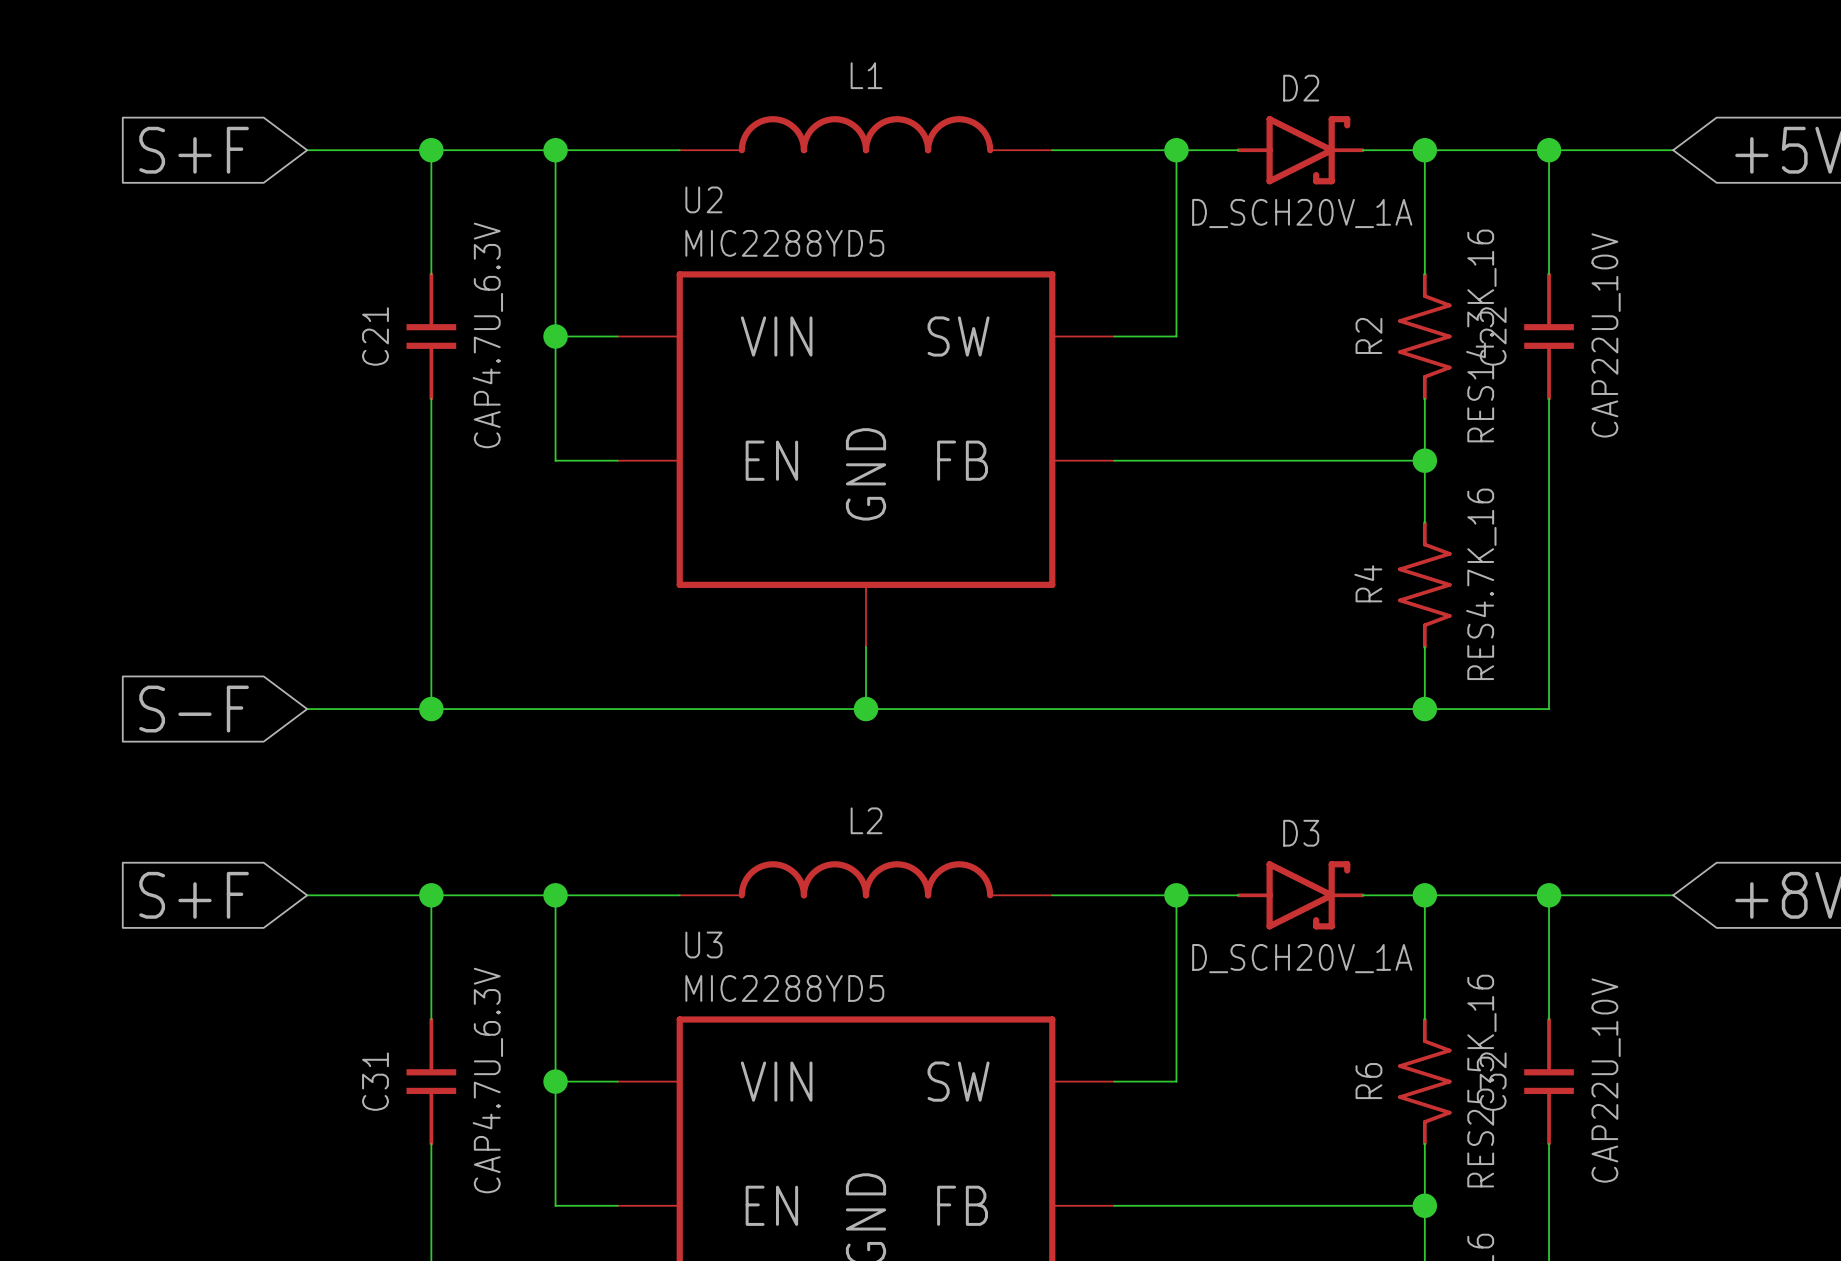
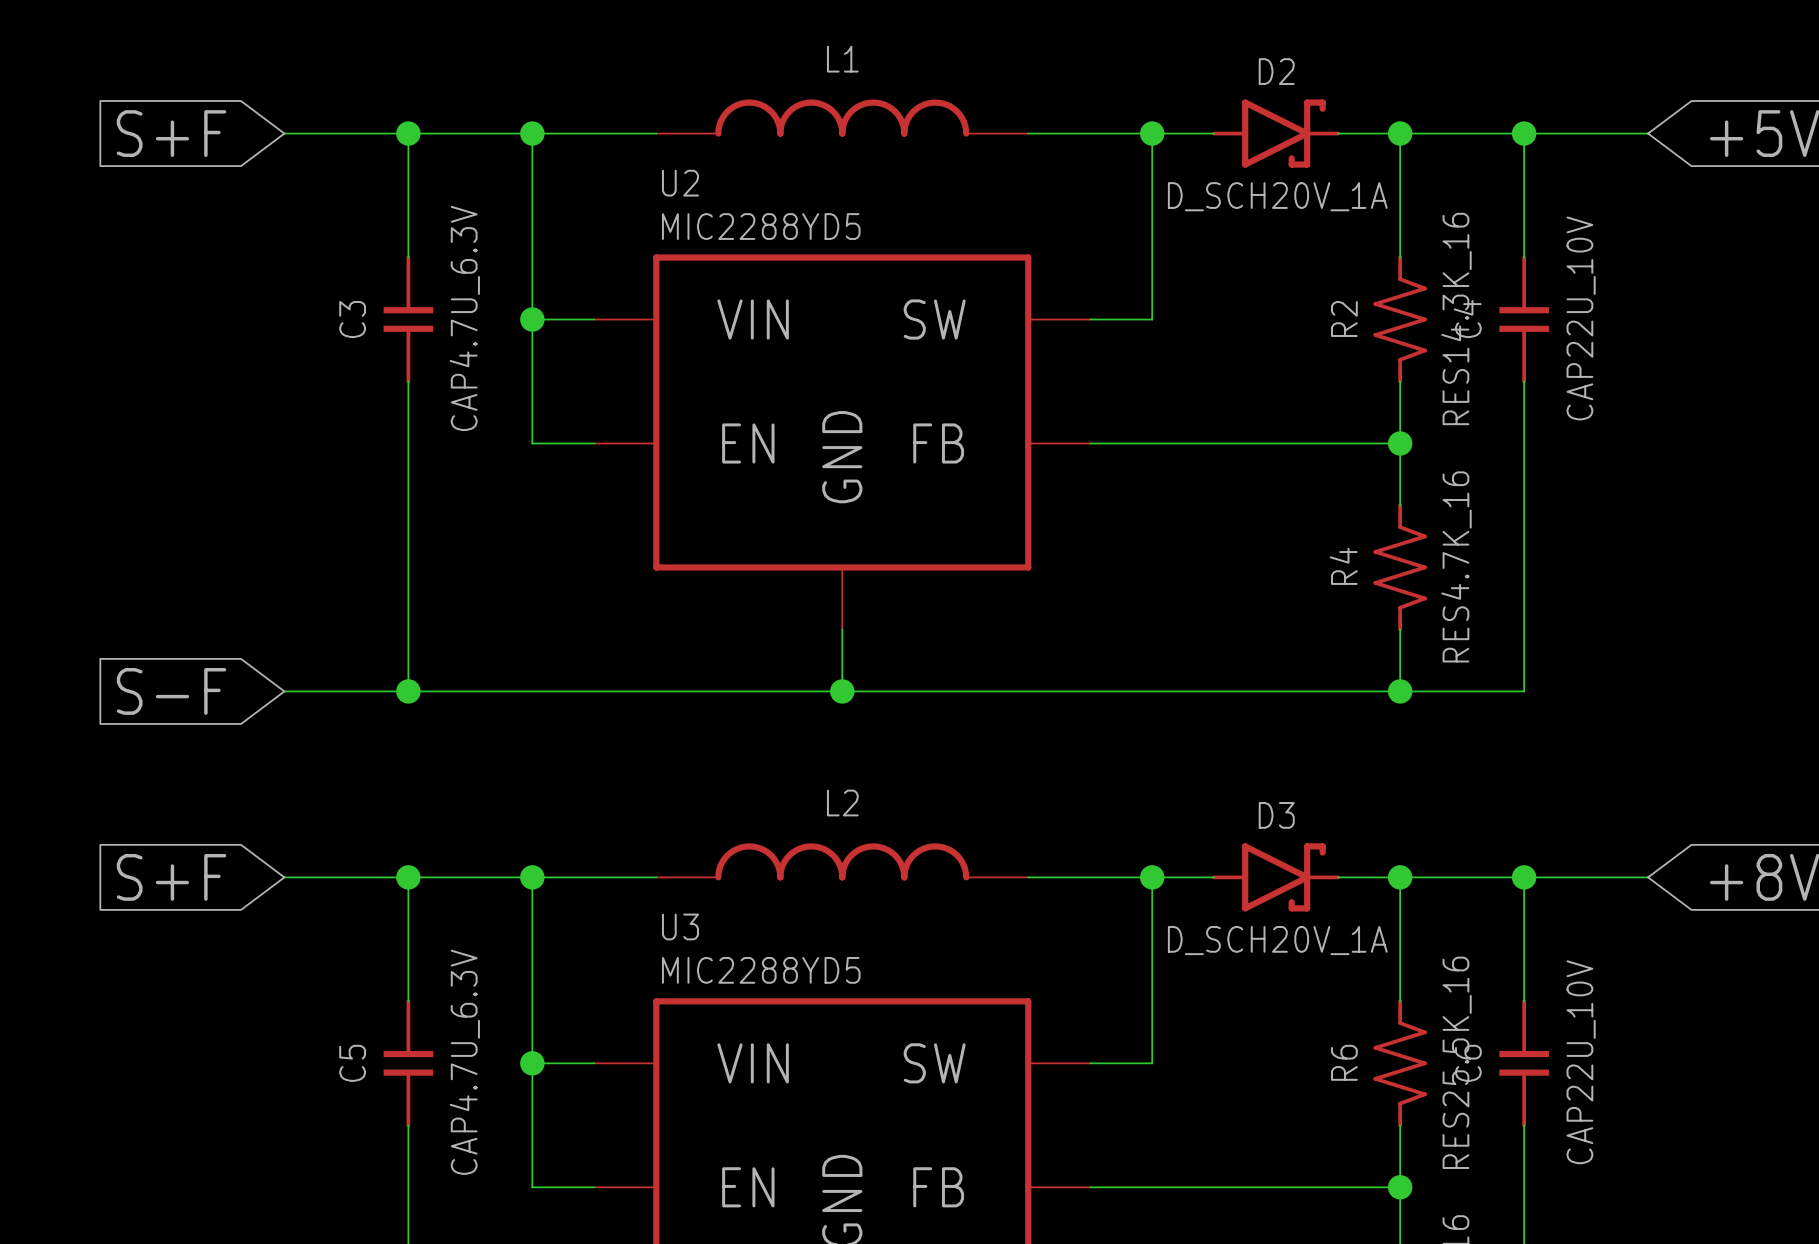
C21 name: C21 (375, 336) -> C3 (352, 319)
C22 name: C22 (1493, 336) -> C4 (1467, 318)
C31 name: C31 (375, 1081) -> C5 (352, 1063)
C32 name: C32 (1493, 1081) -> C6 (1468, 1063)

